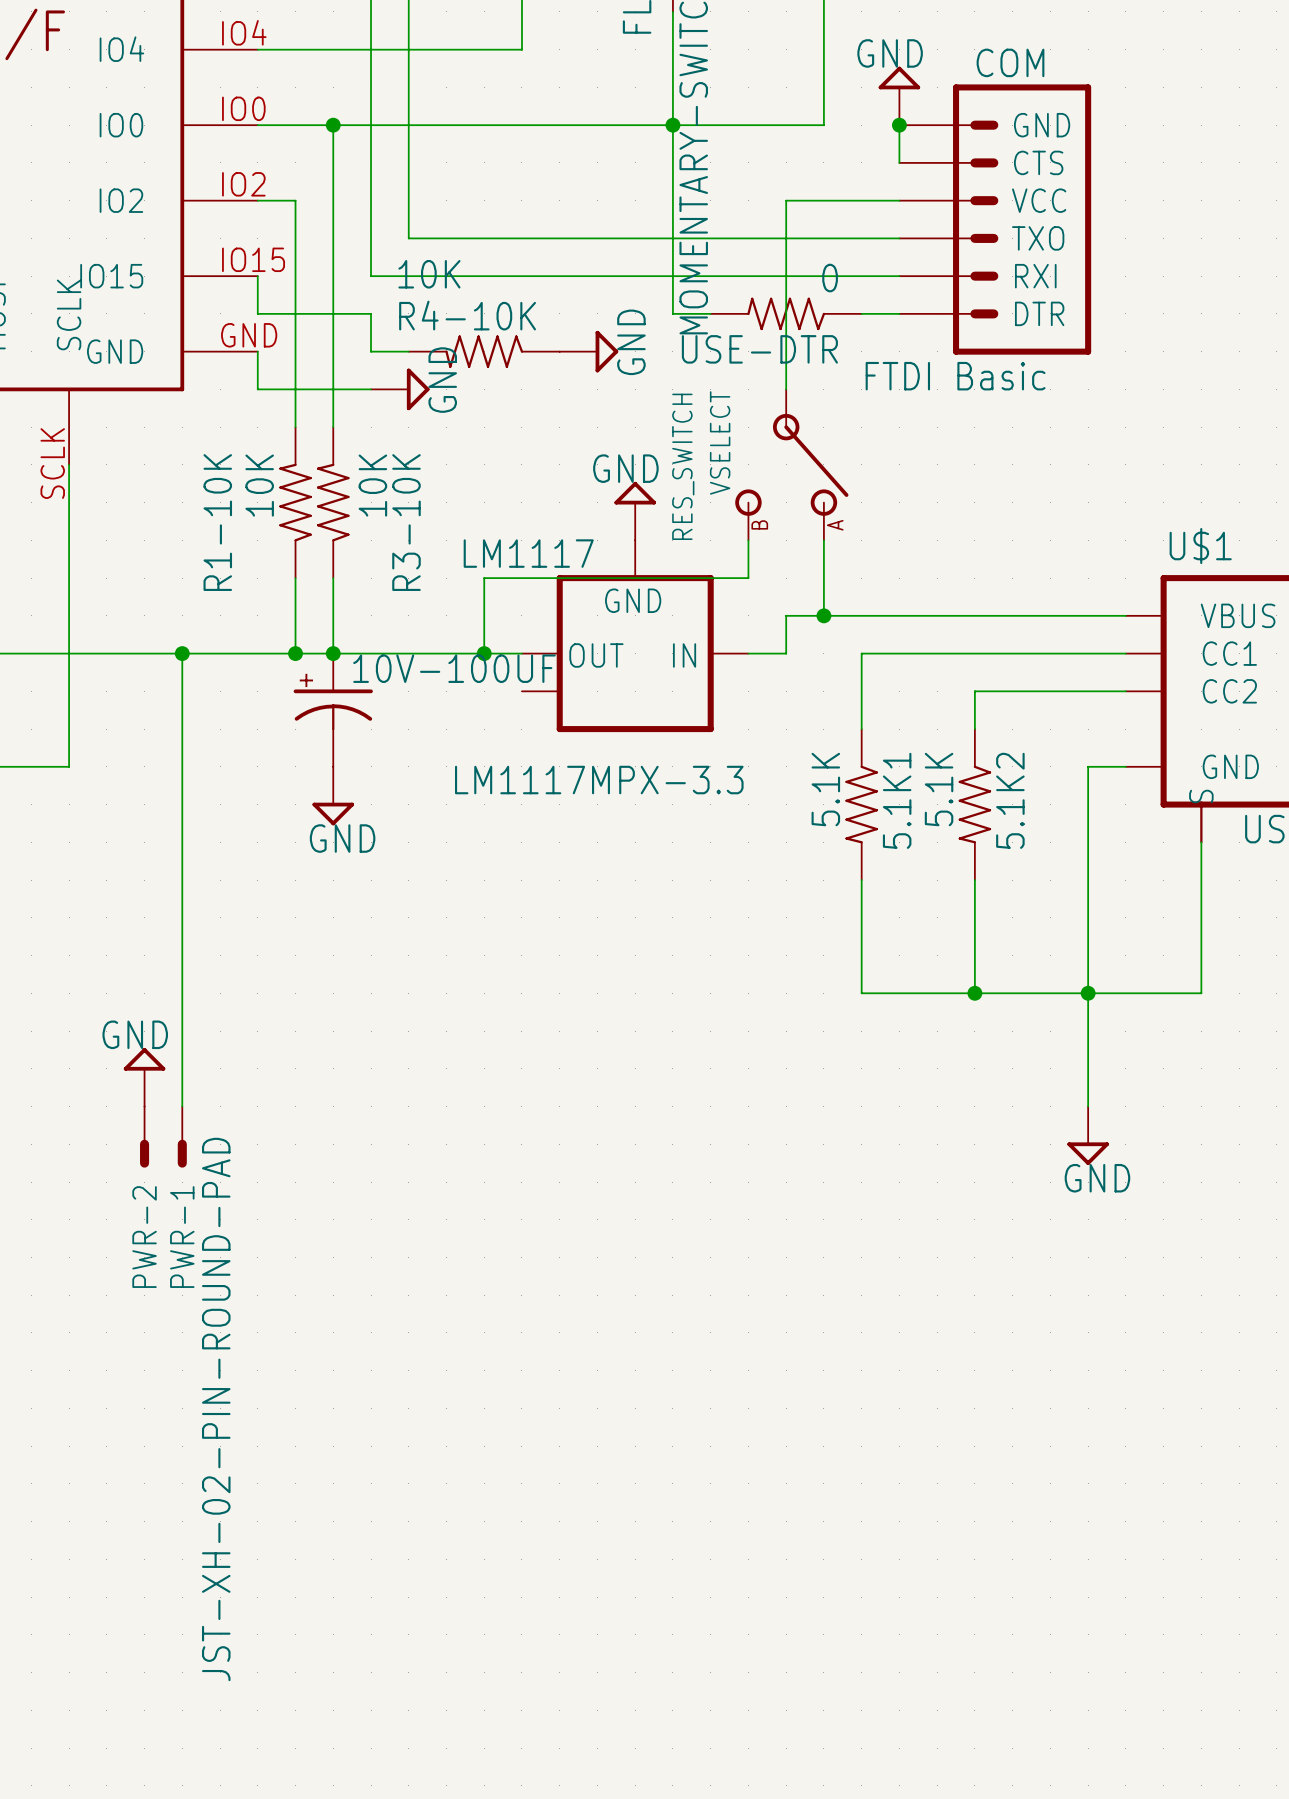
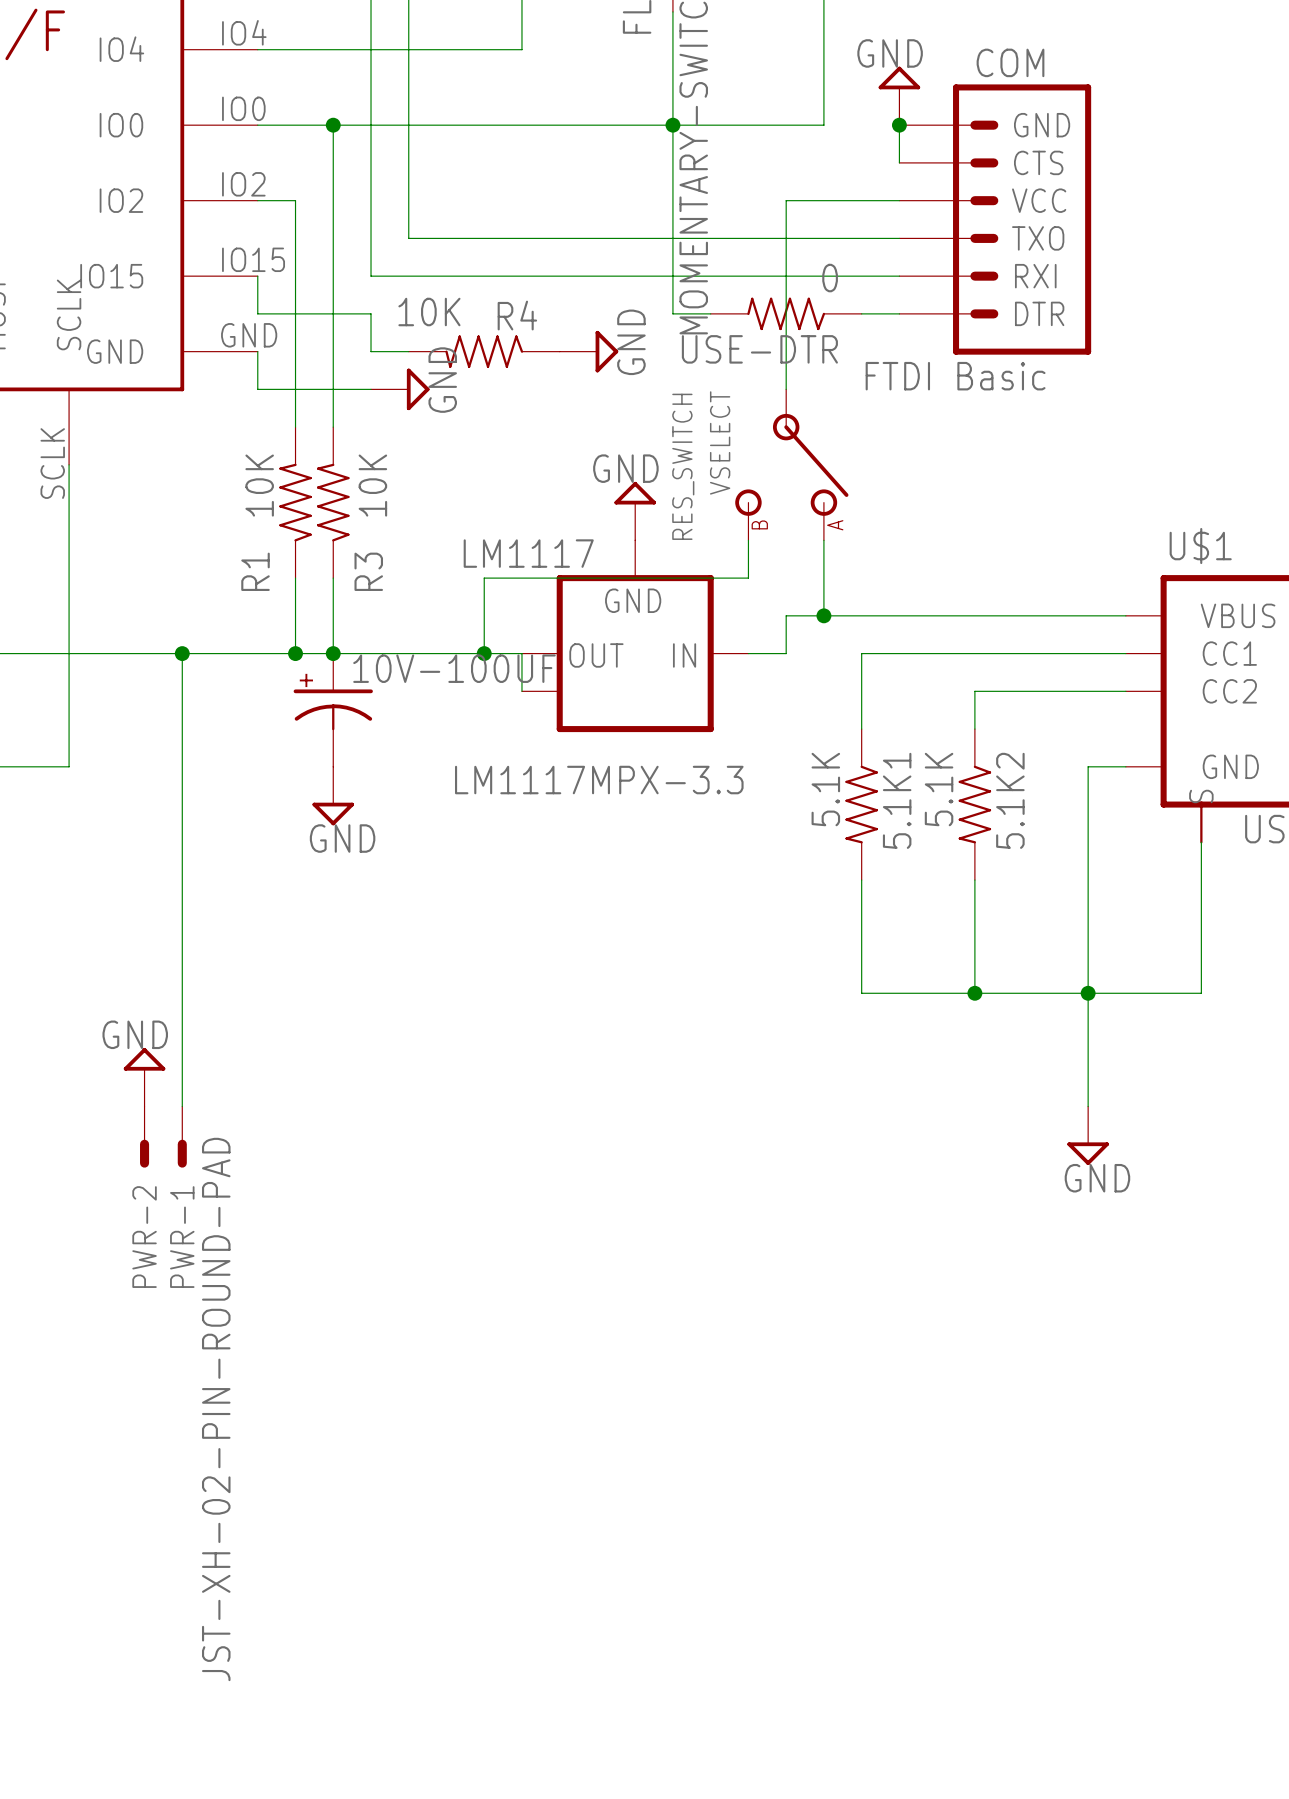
R4-10K value position: 10K (429, 274) -> 10K (429, 312)
R4-10K name: R4-10K (467, 315) -> R4 (517, 315)
R1-10K name: R1-10K (217, 522) -> R1 (255, 571)
R3-10K name: R3-10K (406, 522) -> R3 (368, 571)
wire: none -> (521, 653) (521, 691)

